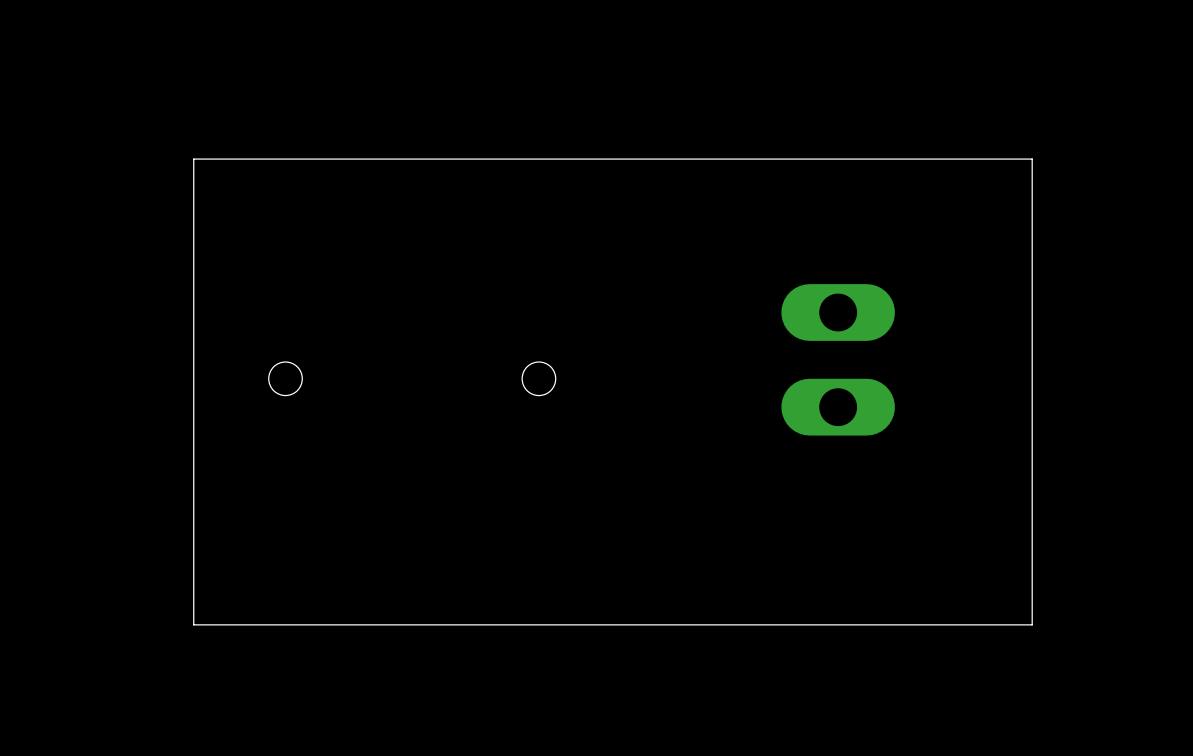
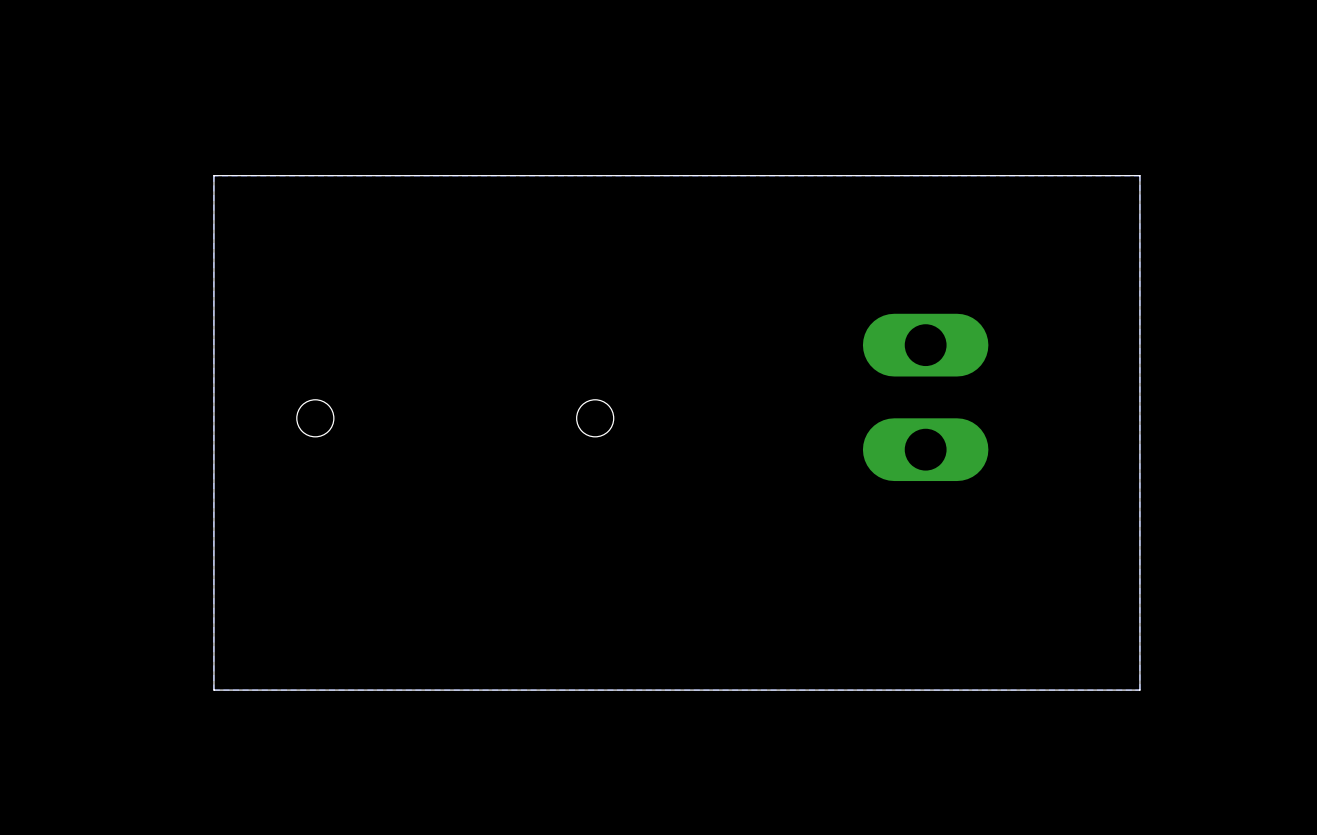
zone outline: none -> (1139, 175) (213, 175) (213, 690) (1139, 690) (1139, 175)

